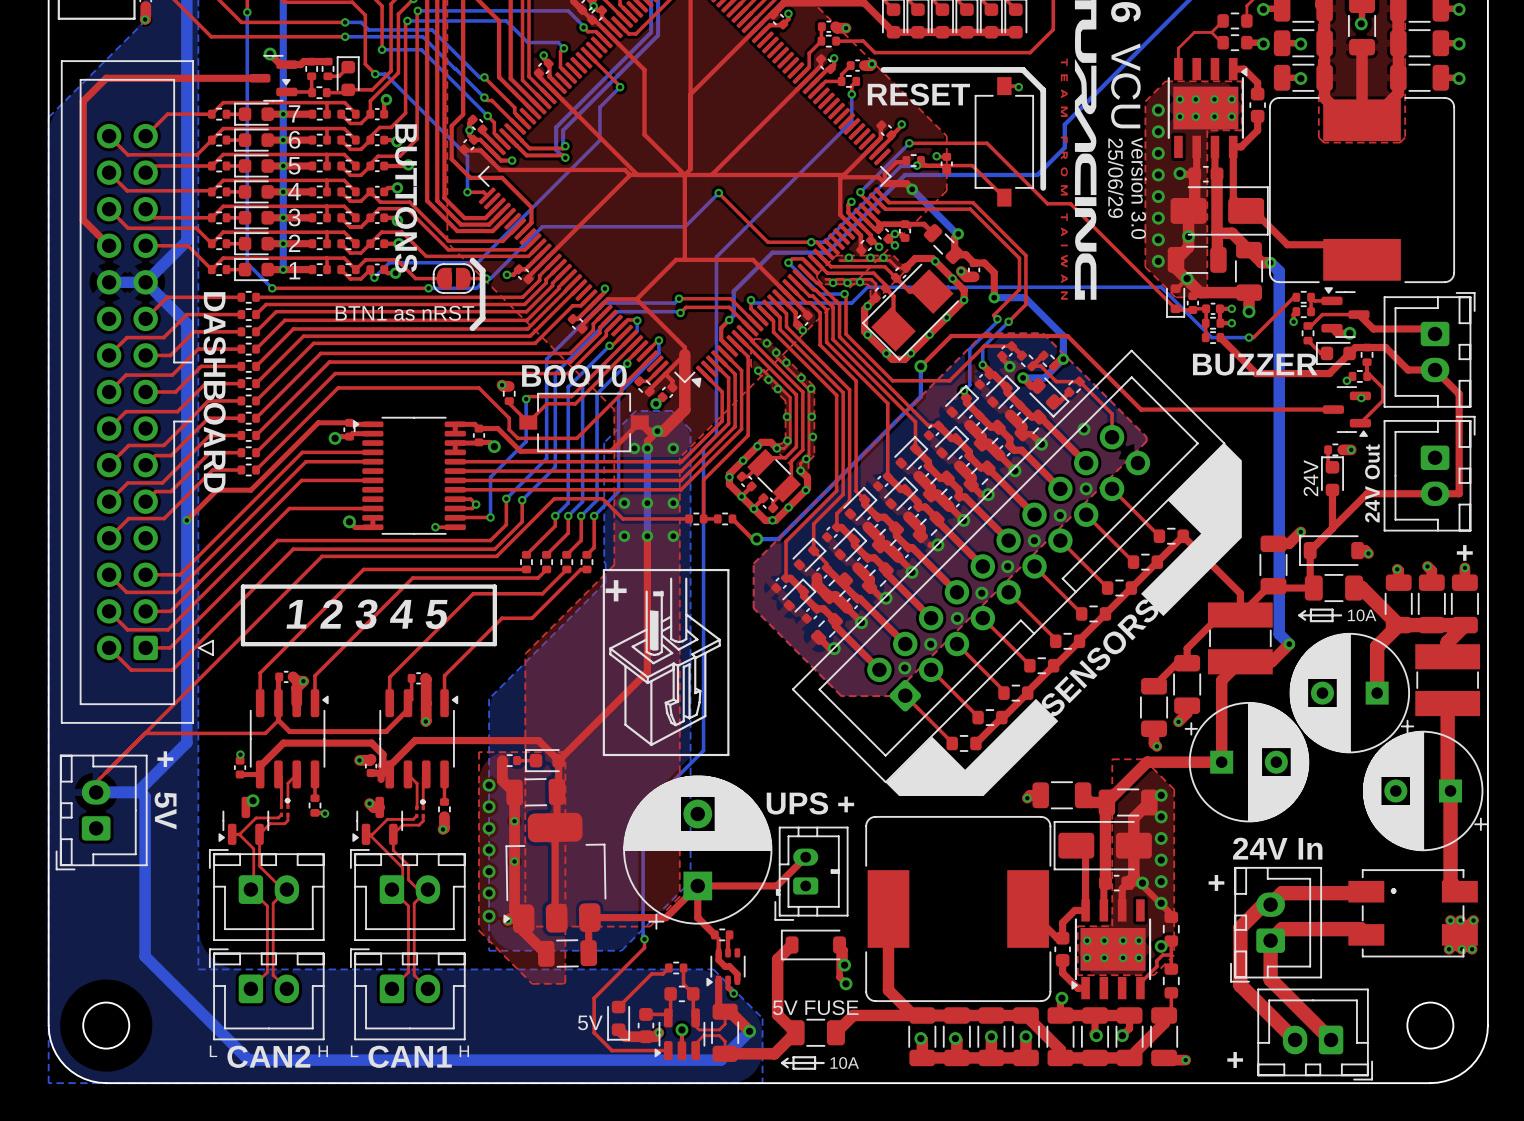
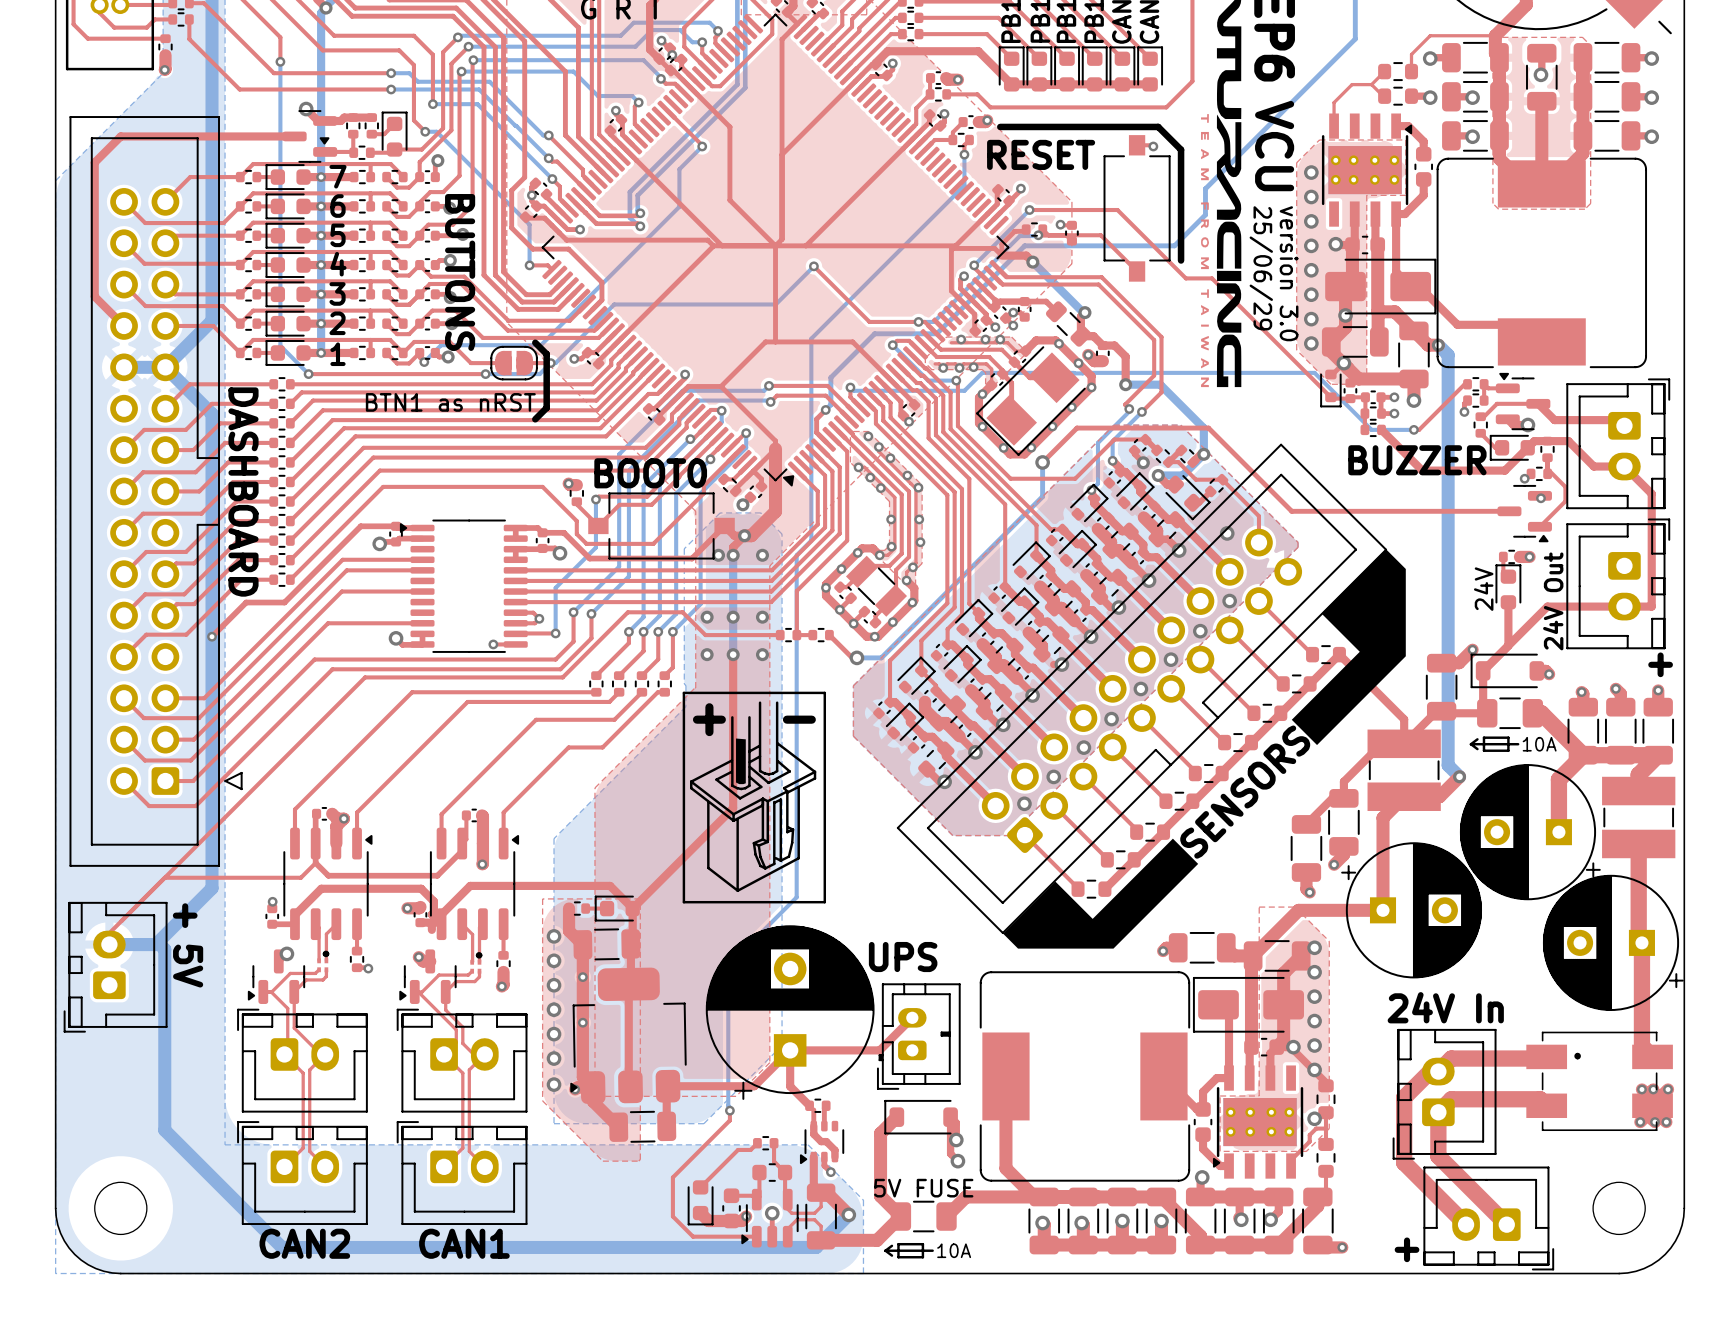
line: (242, 586) (494, 586) (494, 644) (242, 644) (242, 586) -> none
text: 1 2 3 4 5 (367, 614) -> none
text: + (846, 804) -> none
text: + (1216, 882) -> none
text: 5V (590, 1022) -> none
text: L (213, 1051) -> none
text: H (323, 1051) -> none
text: L (354, 1051) -> none
text: H (464, 1051) -> none

